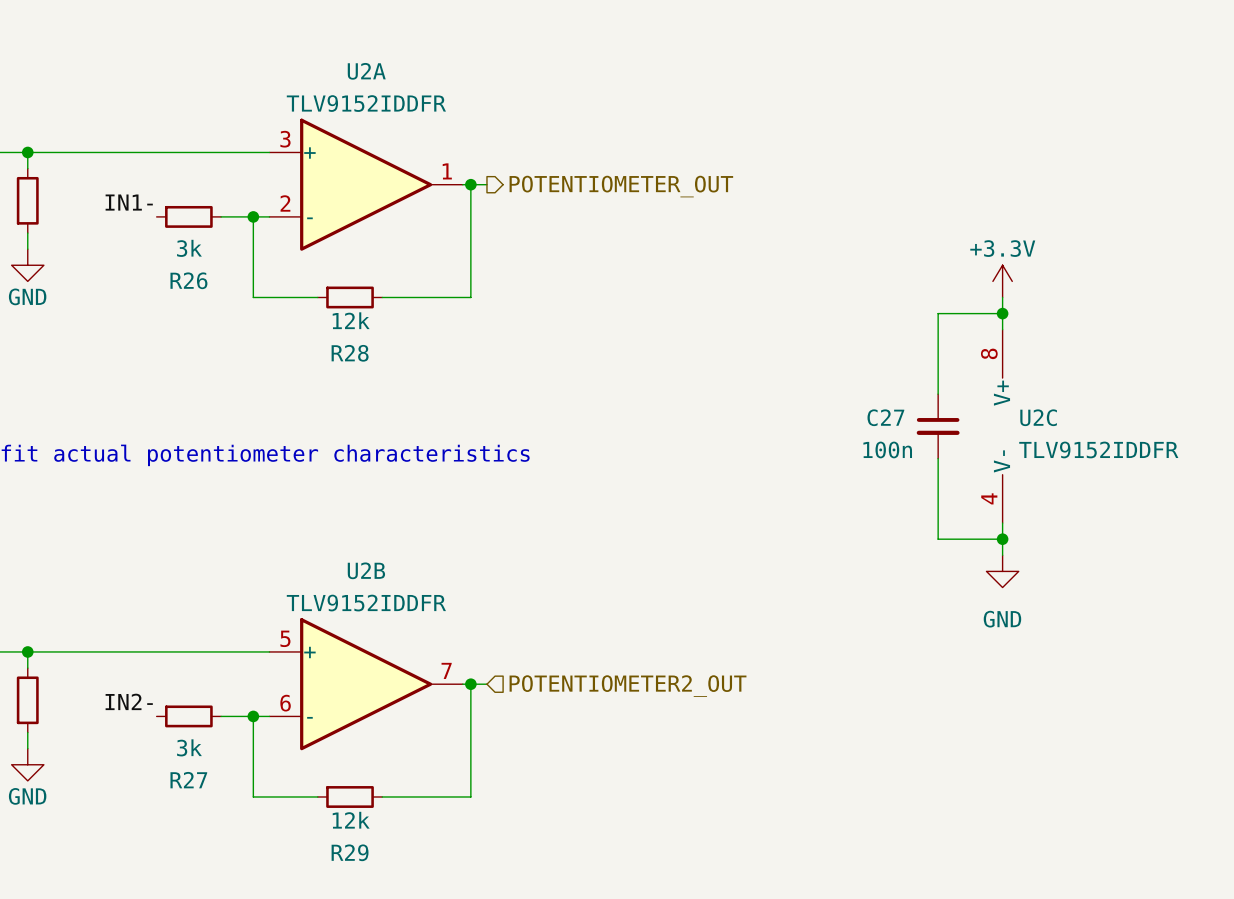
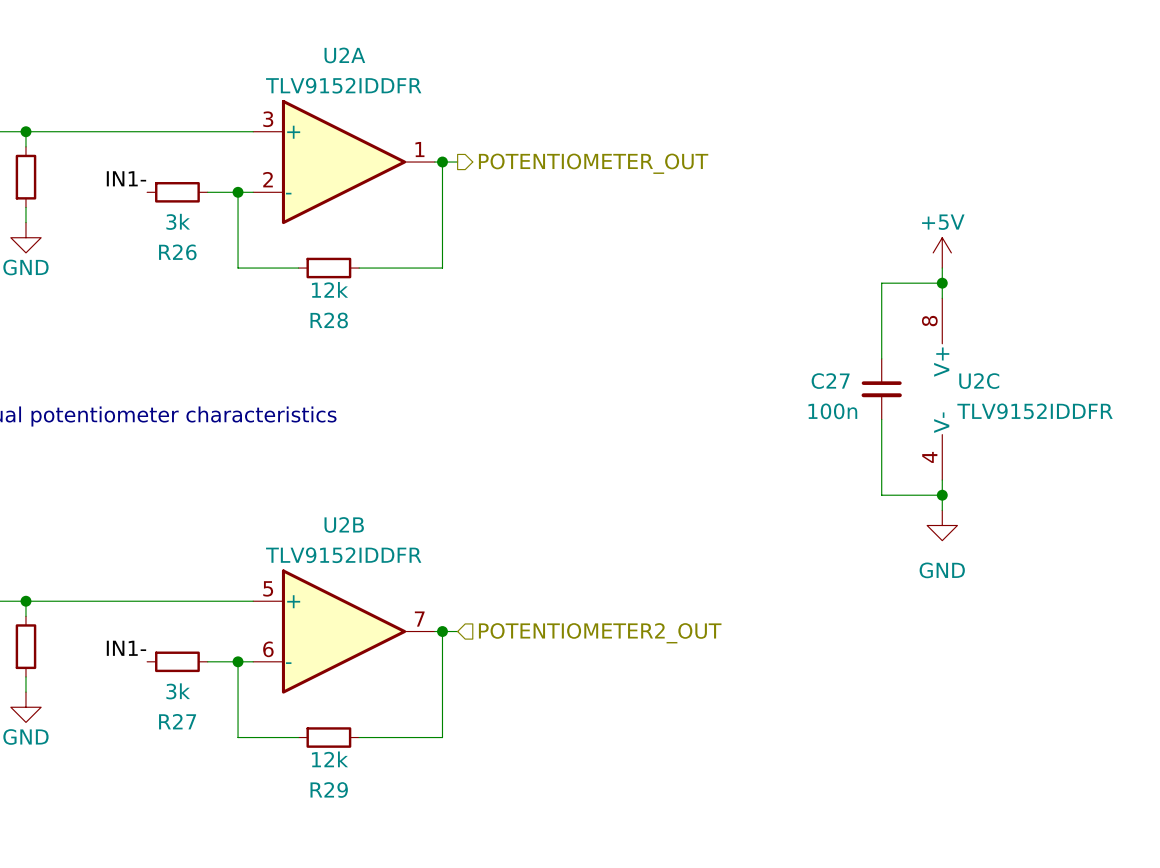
power symbol: +3.3V (1002, 281) -> +5V (942, 252)
label: IN2- (129, 701) -> IN1- (126, 648)

